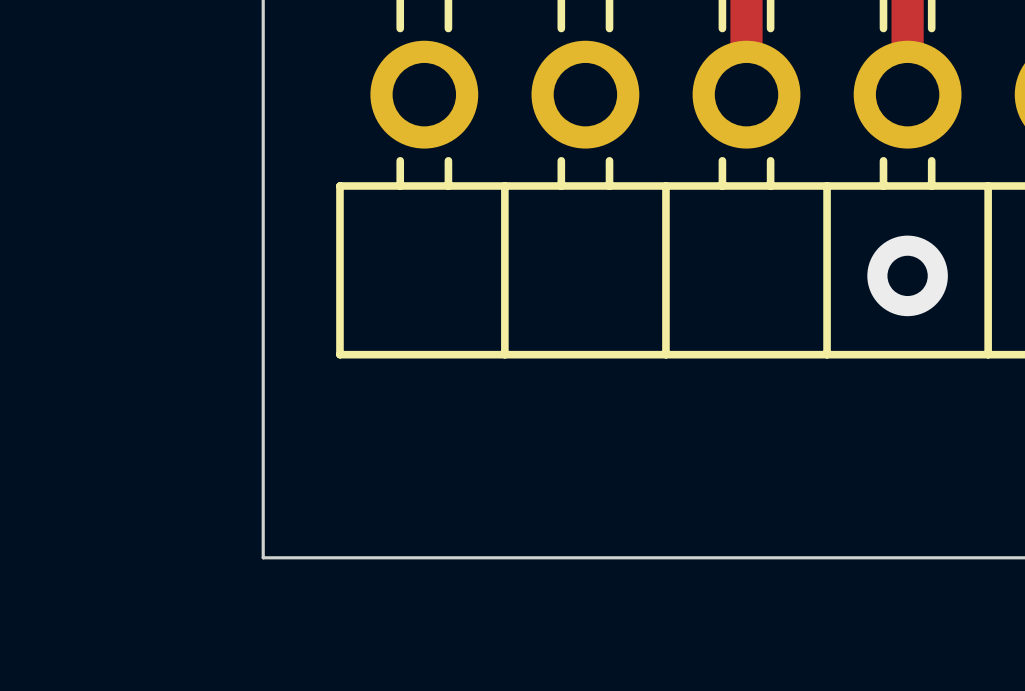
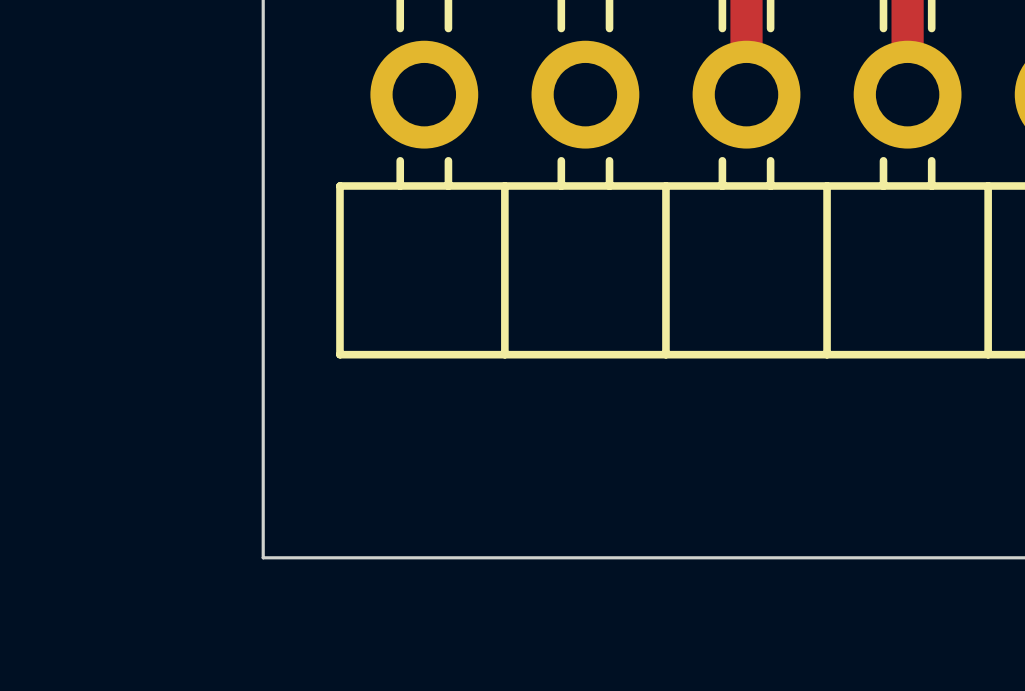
via: (907, 275) -> none

